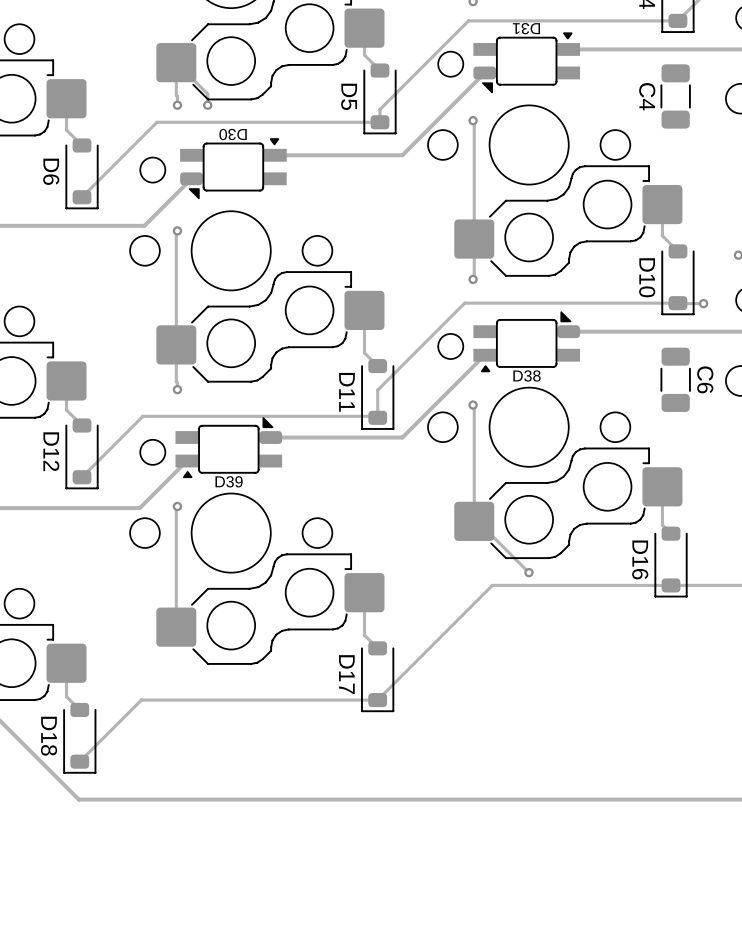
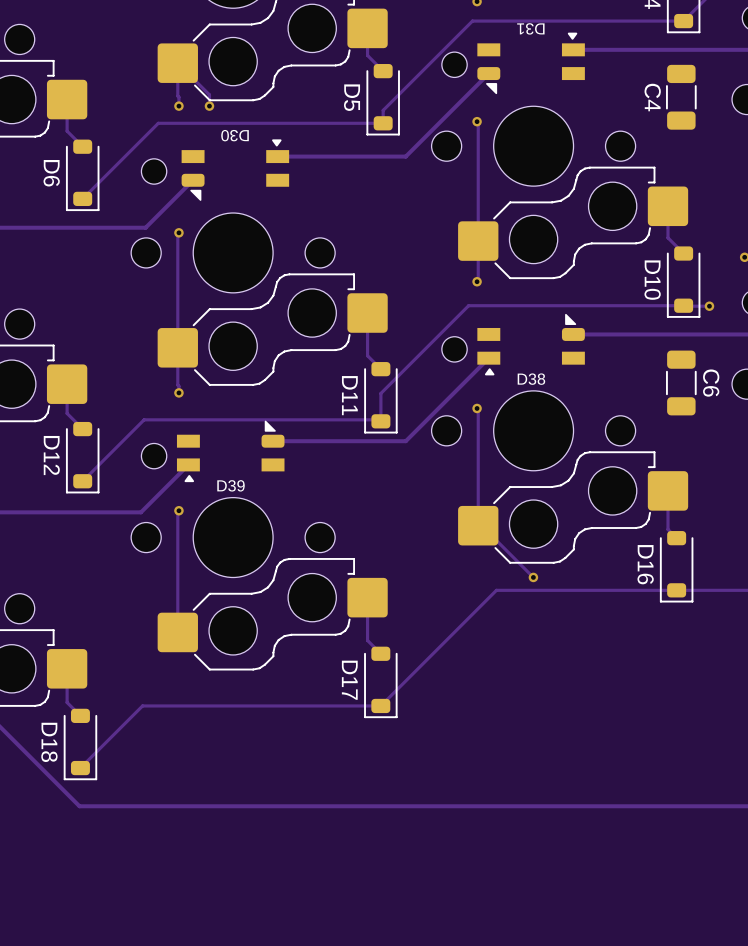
D31 footprint: [473, 32, 581, 94] -> [477, 32, 585, 95]
D30 footprint: [180, 138, 287, 200] -> [181, 139, 290, 201]
D38 footprint: [473, 311, 581, 373] -> [477, 313, 585, 376]
D39 footprint: [175, 417, 283, 479] -> [176, 420, 285, 483]

